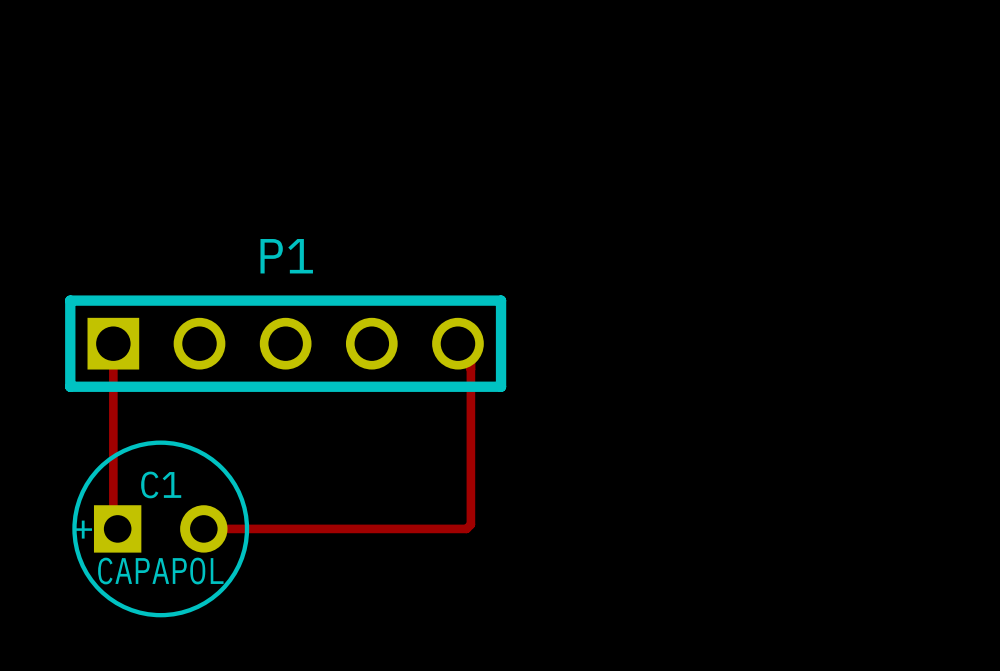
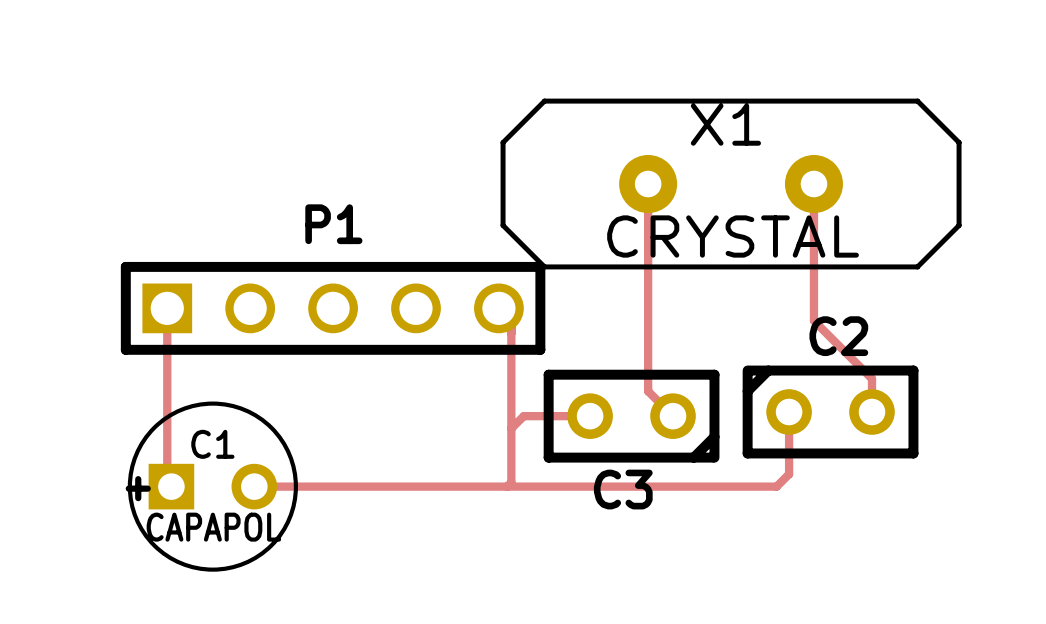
top track: none -> (648, 184) (648, 391) (673, 416)
X1: none -> CRYSTAL (731, 184)
top track: none -> (813, 184) (813, 320) (872, 378) (872, 412)
top track: none -> (789, 412) (789, 474) (776, 486) (507, 486)
C2: none -> (830, 412)
top track: none -> (590, 416) (523, 416) (511, 428)
C3: none -> (631, 416)

